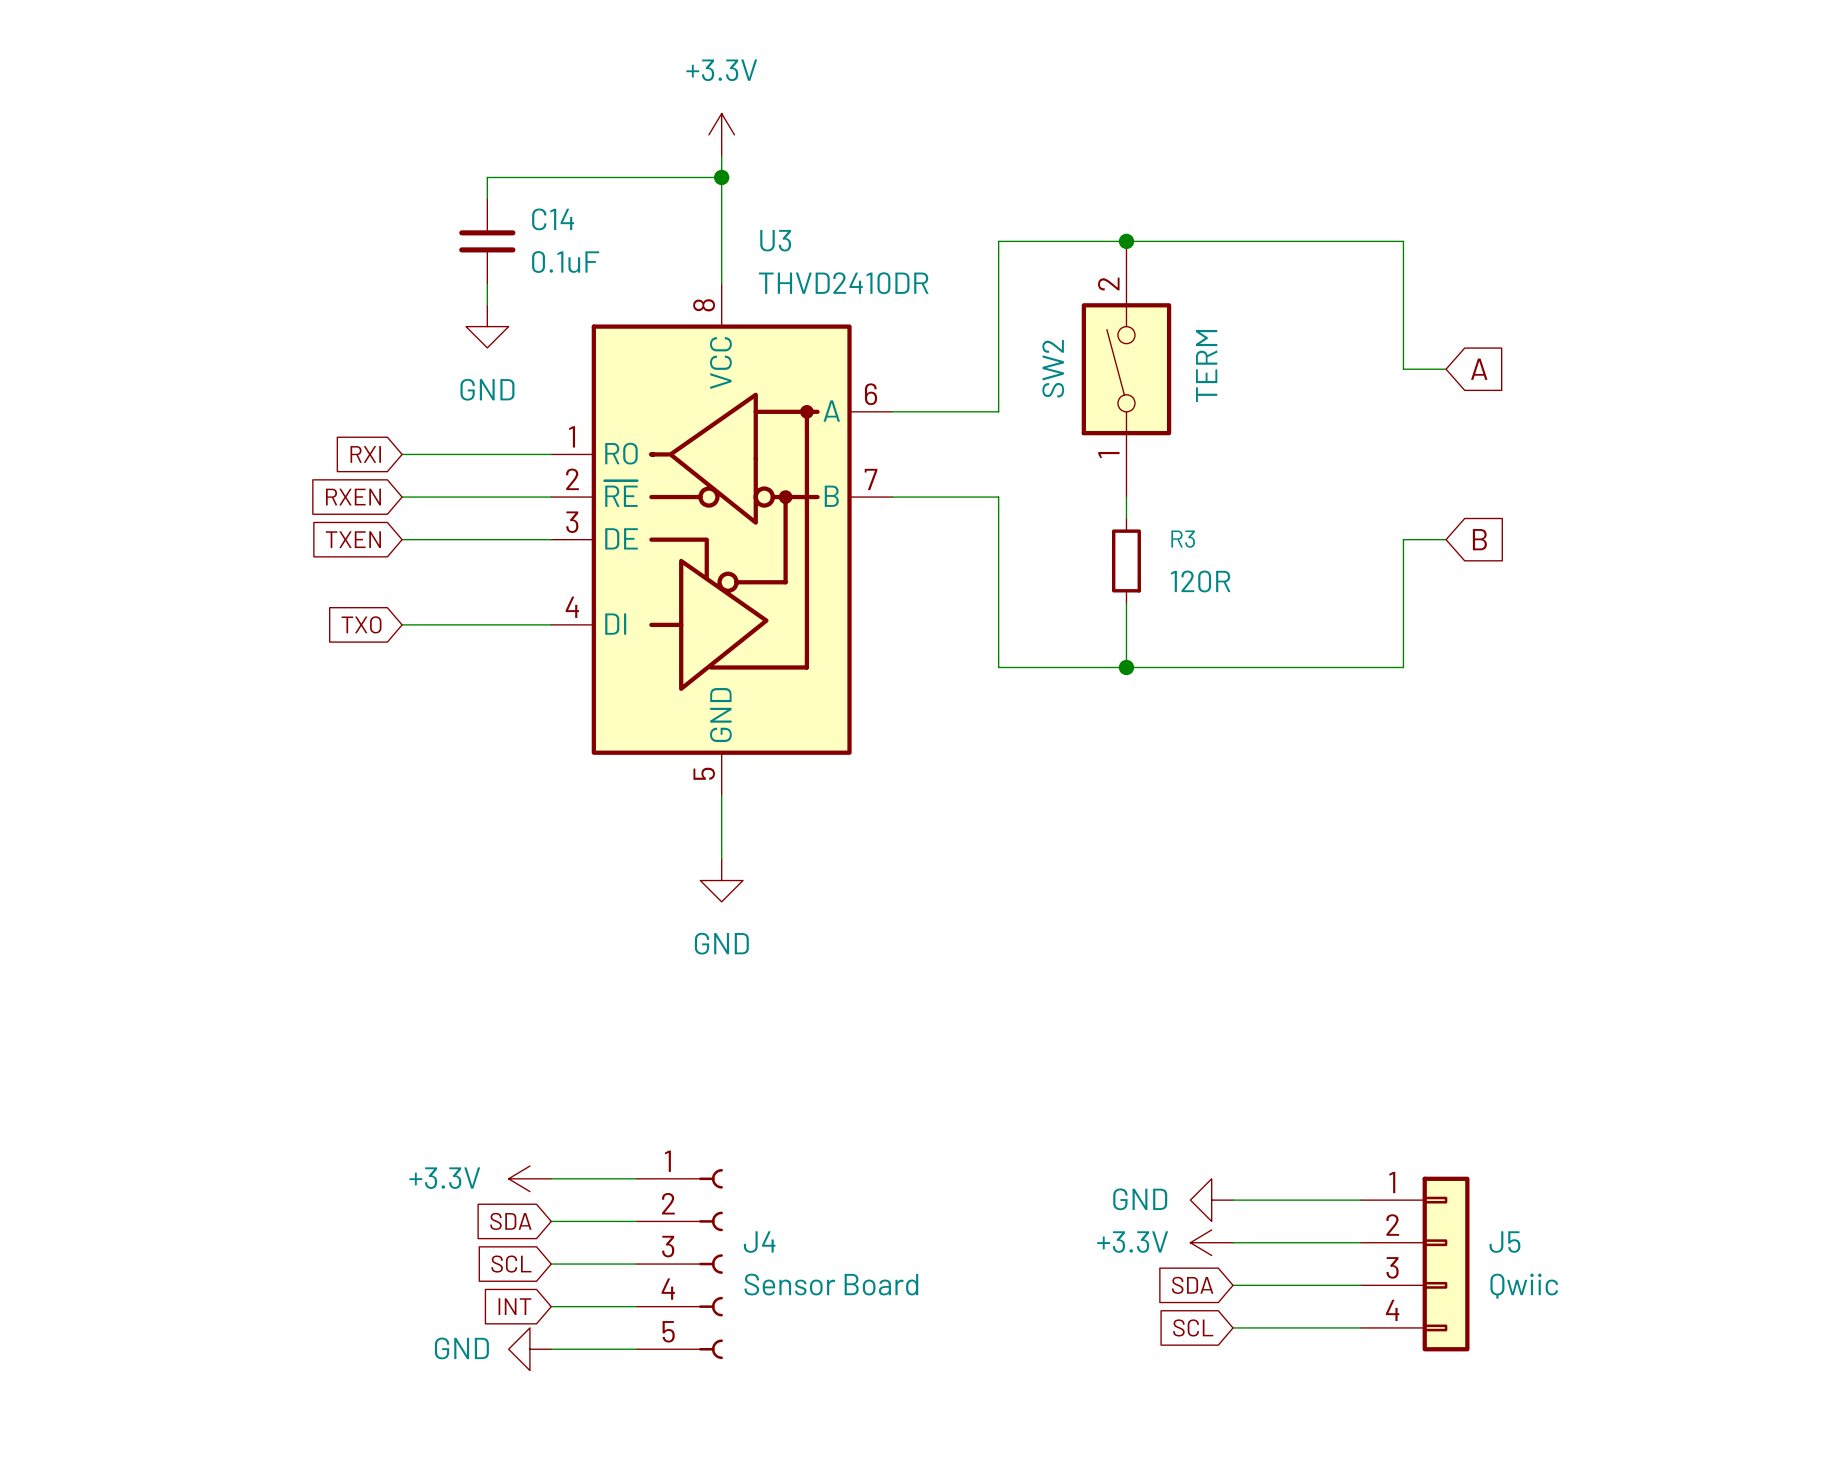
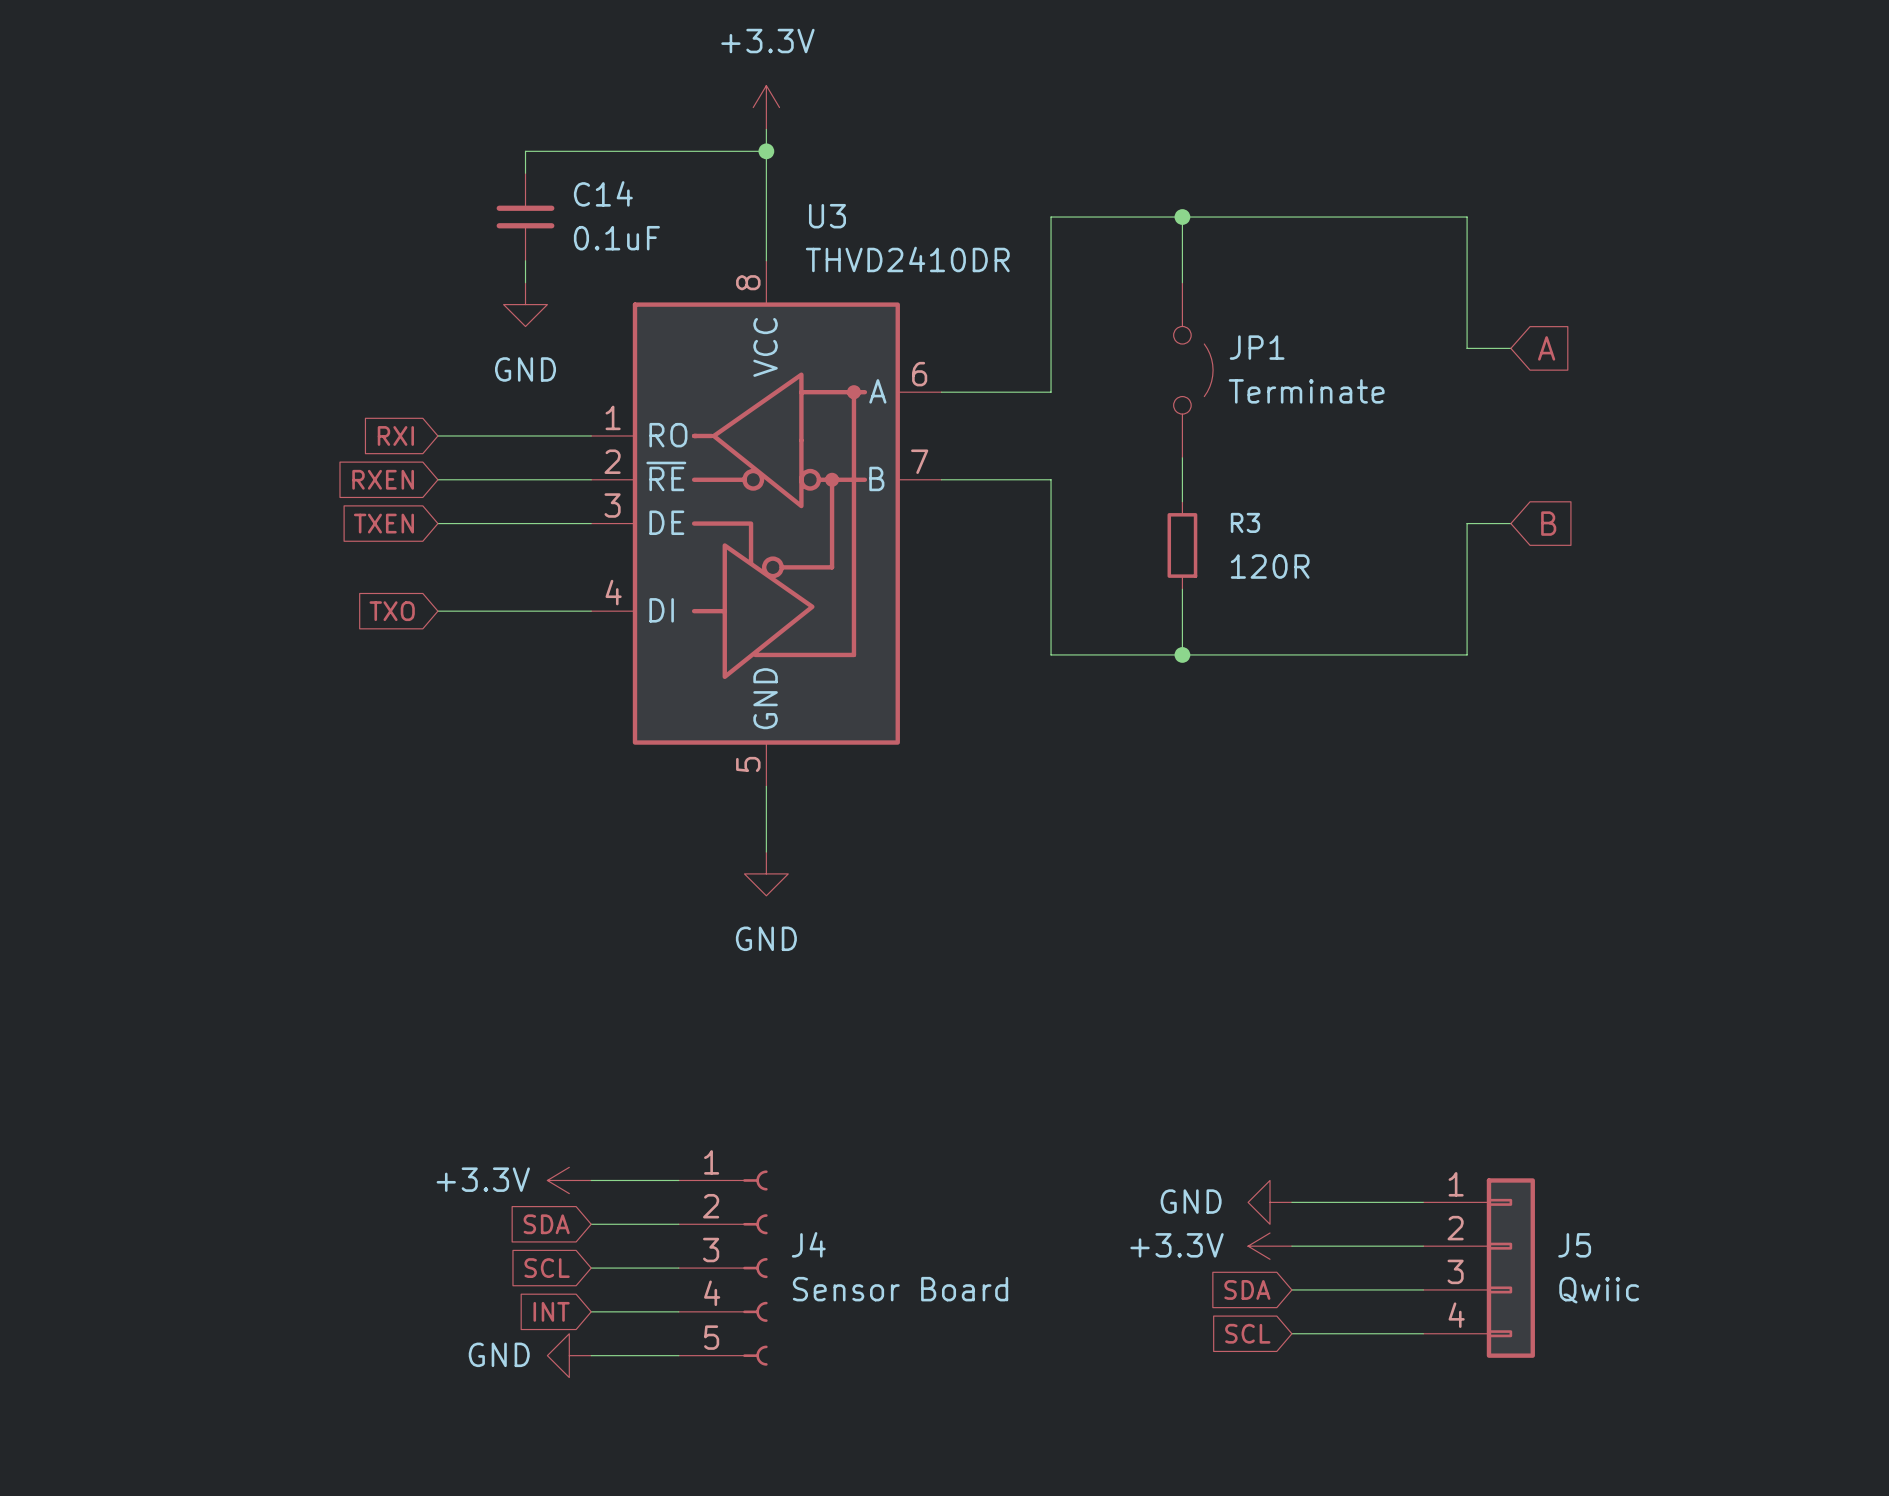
SW2: TERM (1126, 369) -> none
JP1: none -> Terminate (1193, 370)

